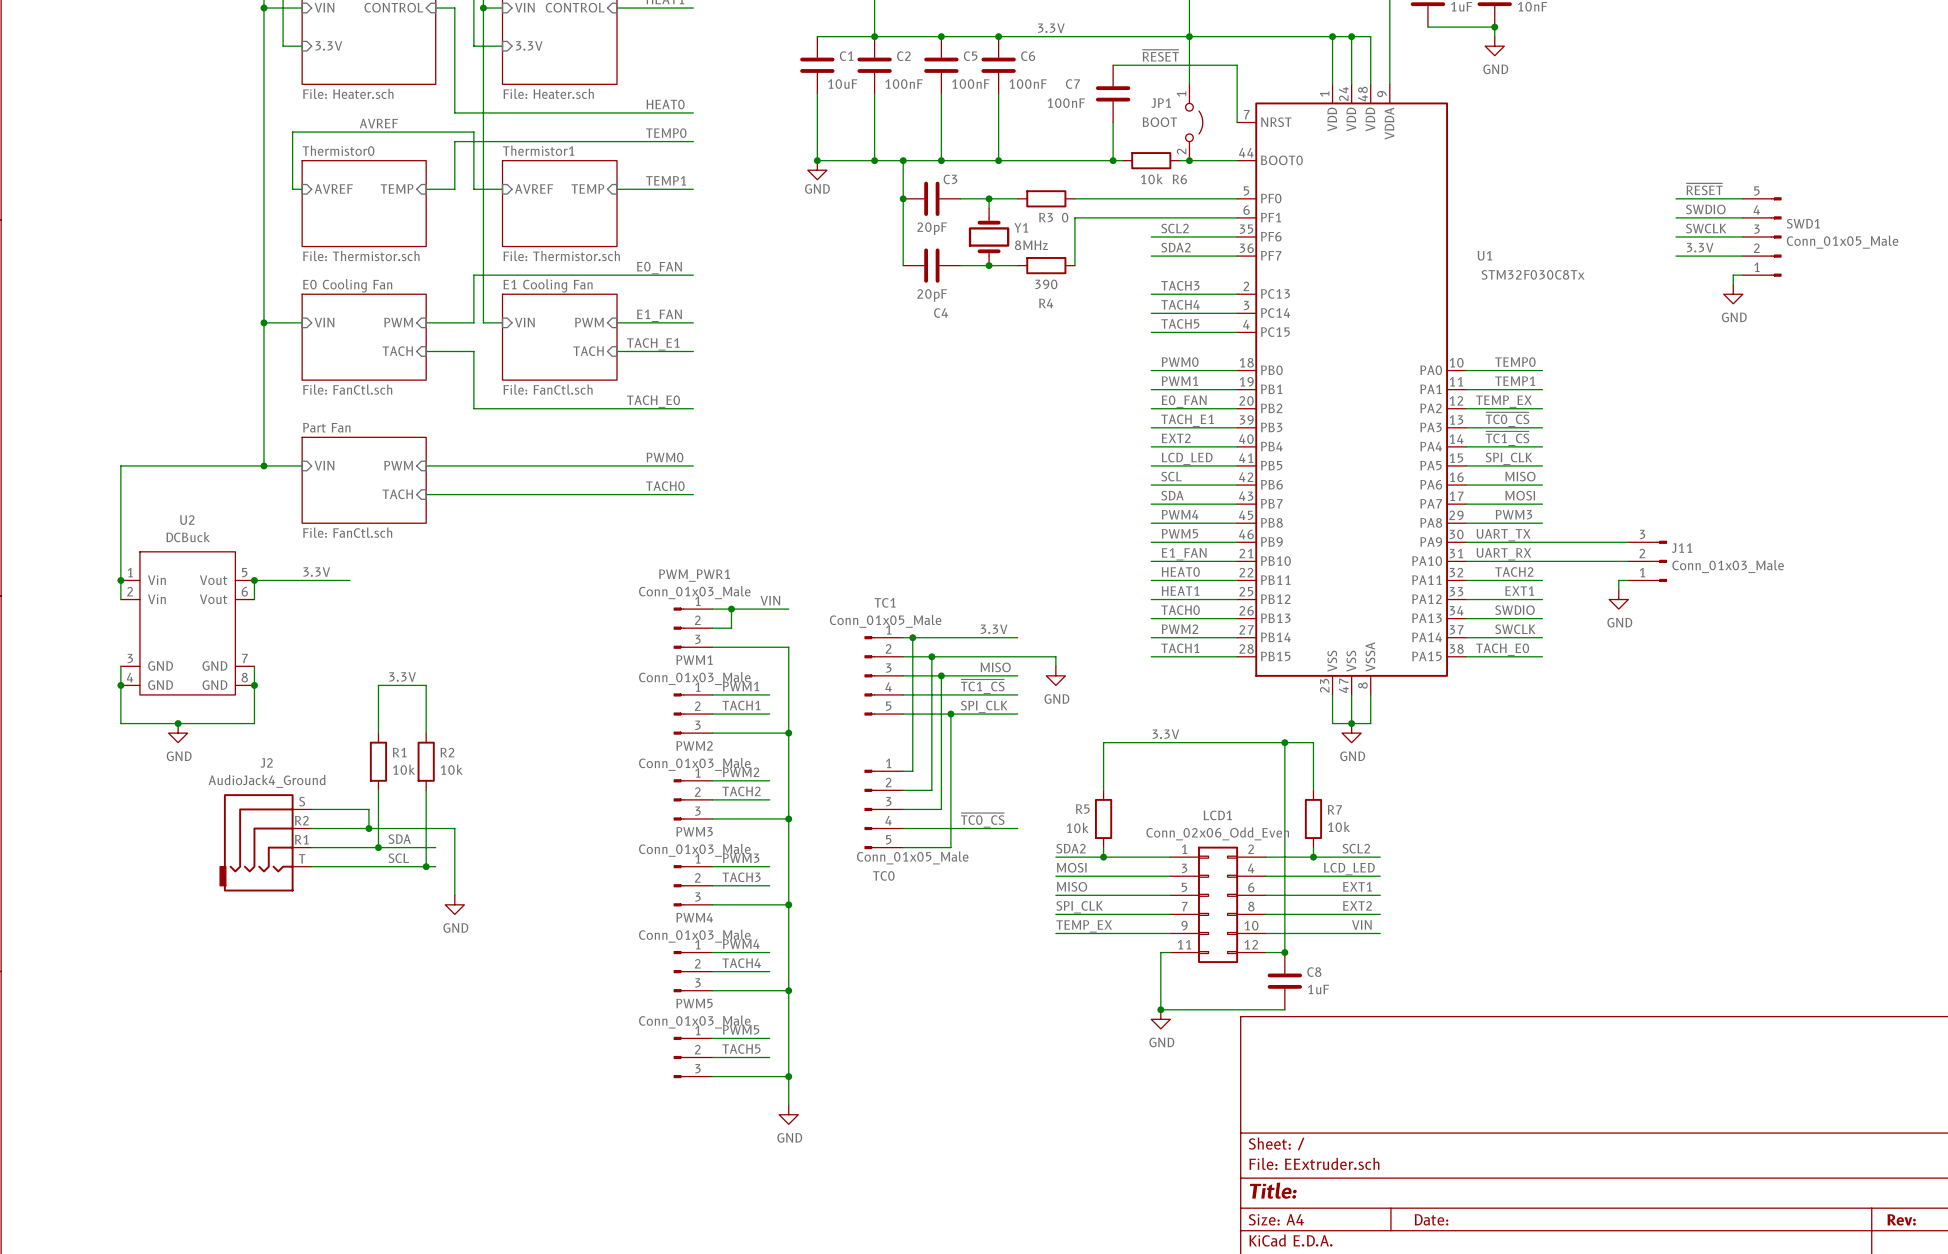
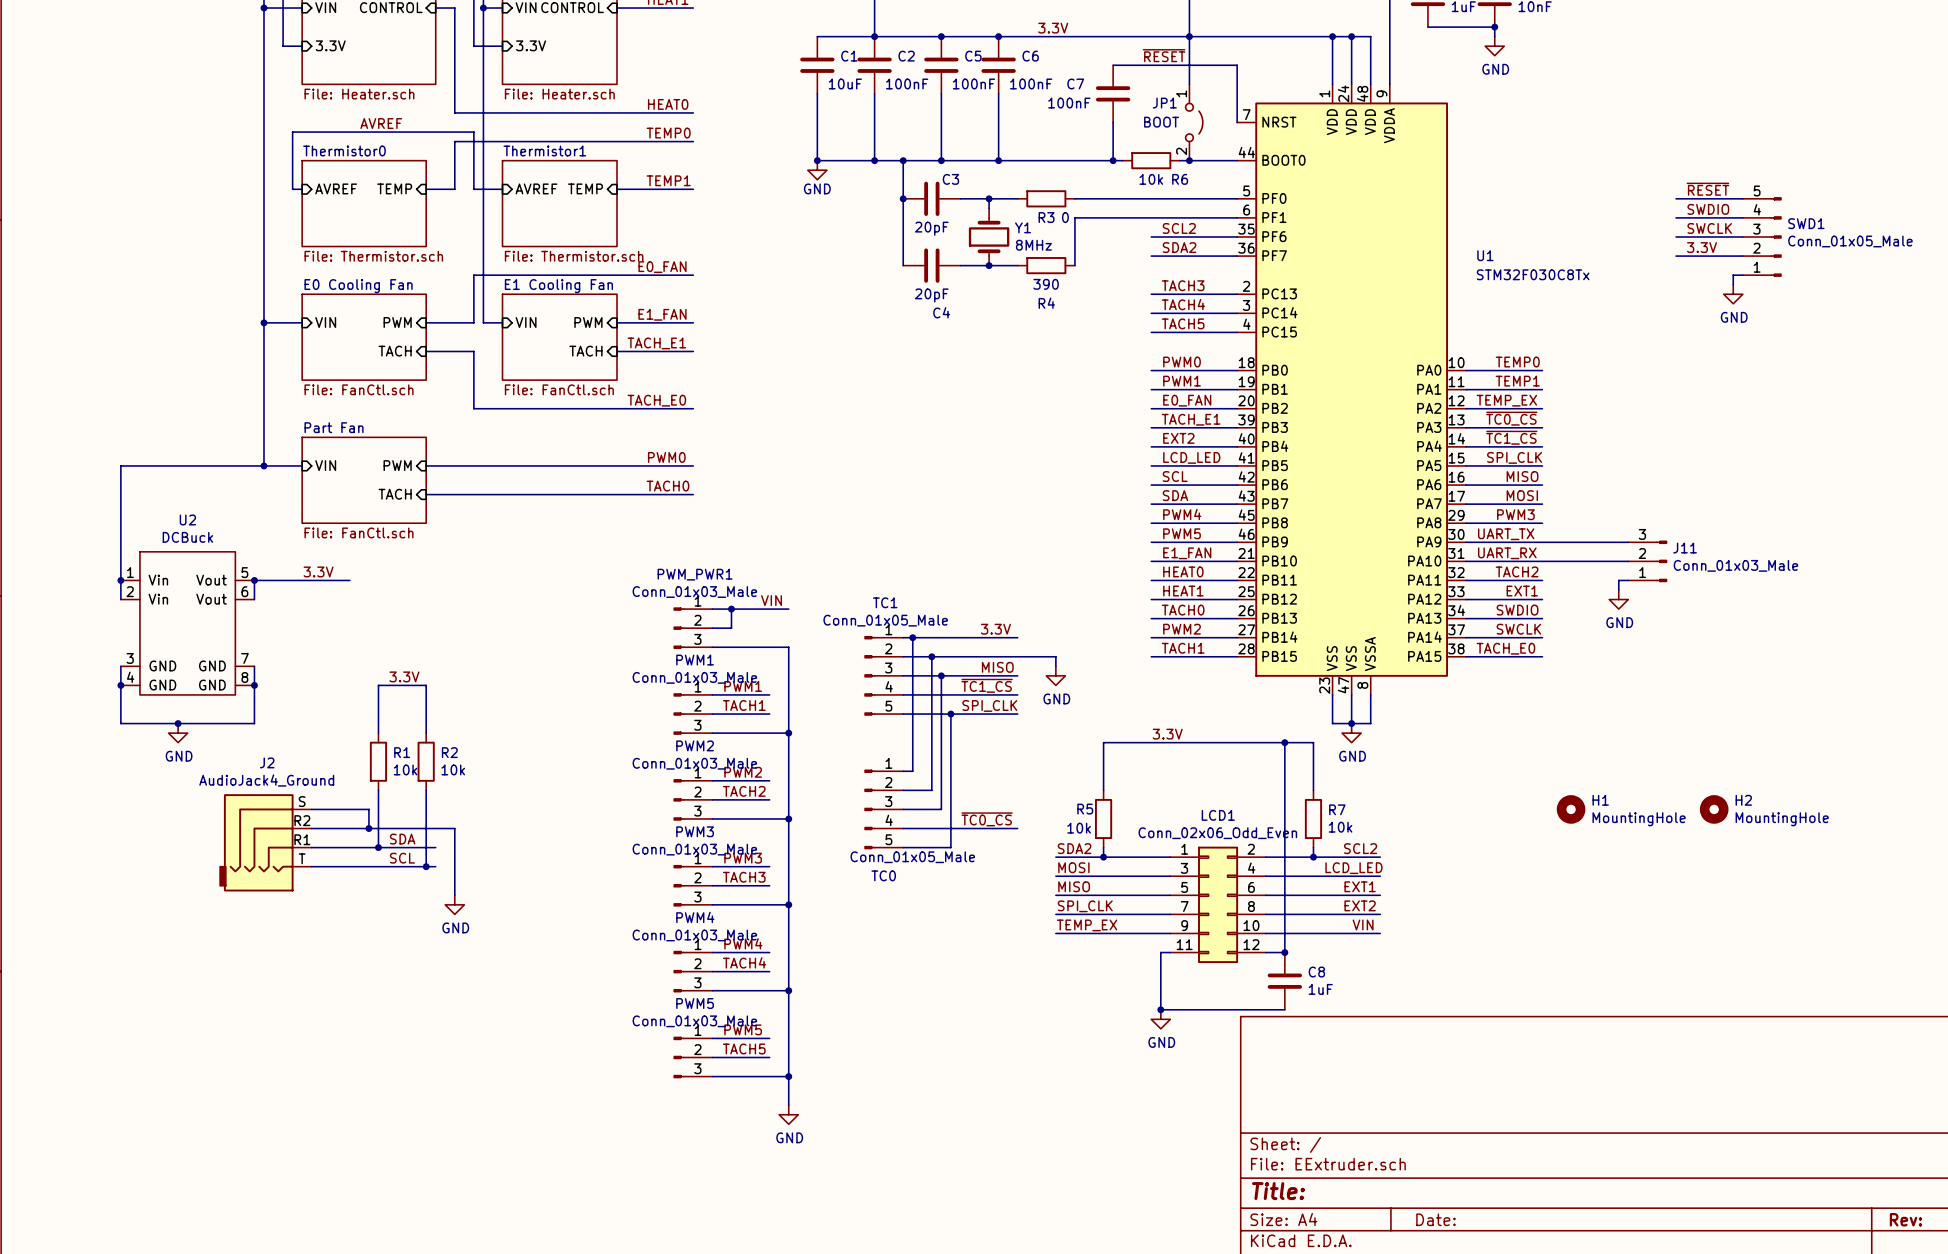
H1: none -> MountingHole (1571, 809)
H2: none -> MountingHole (1714, 809)

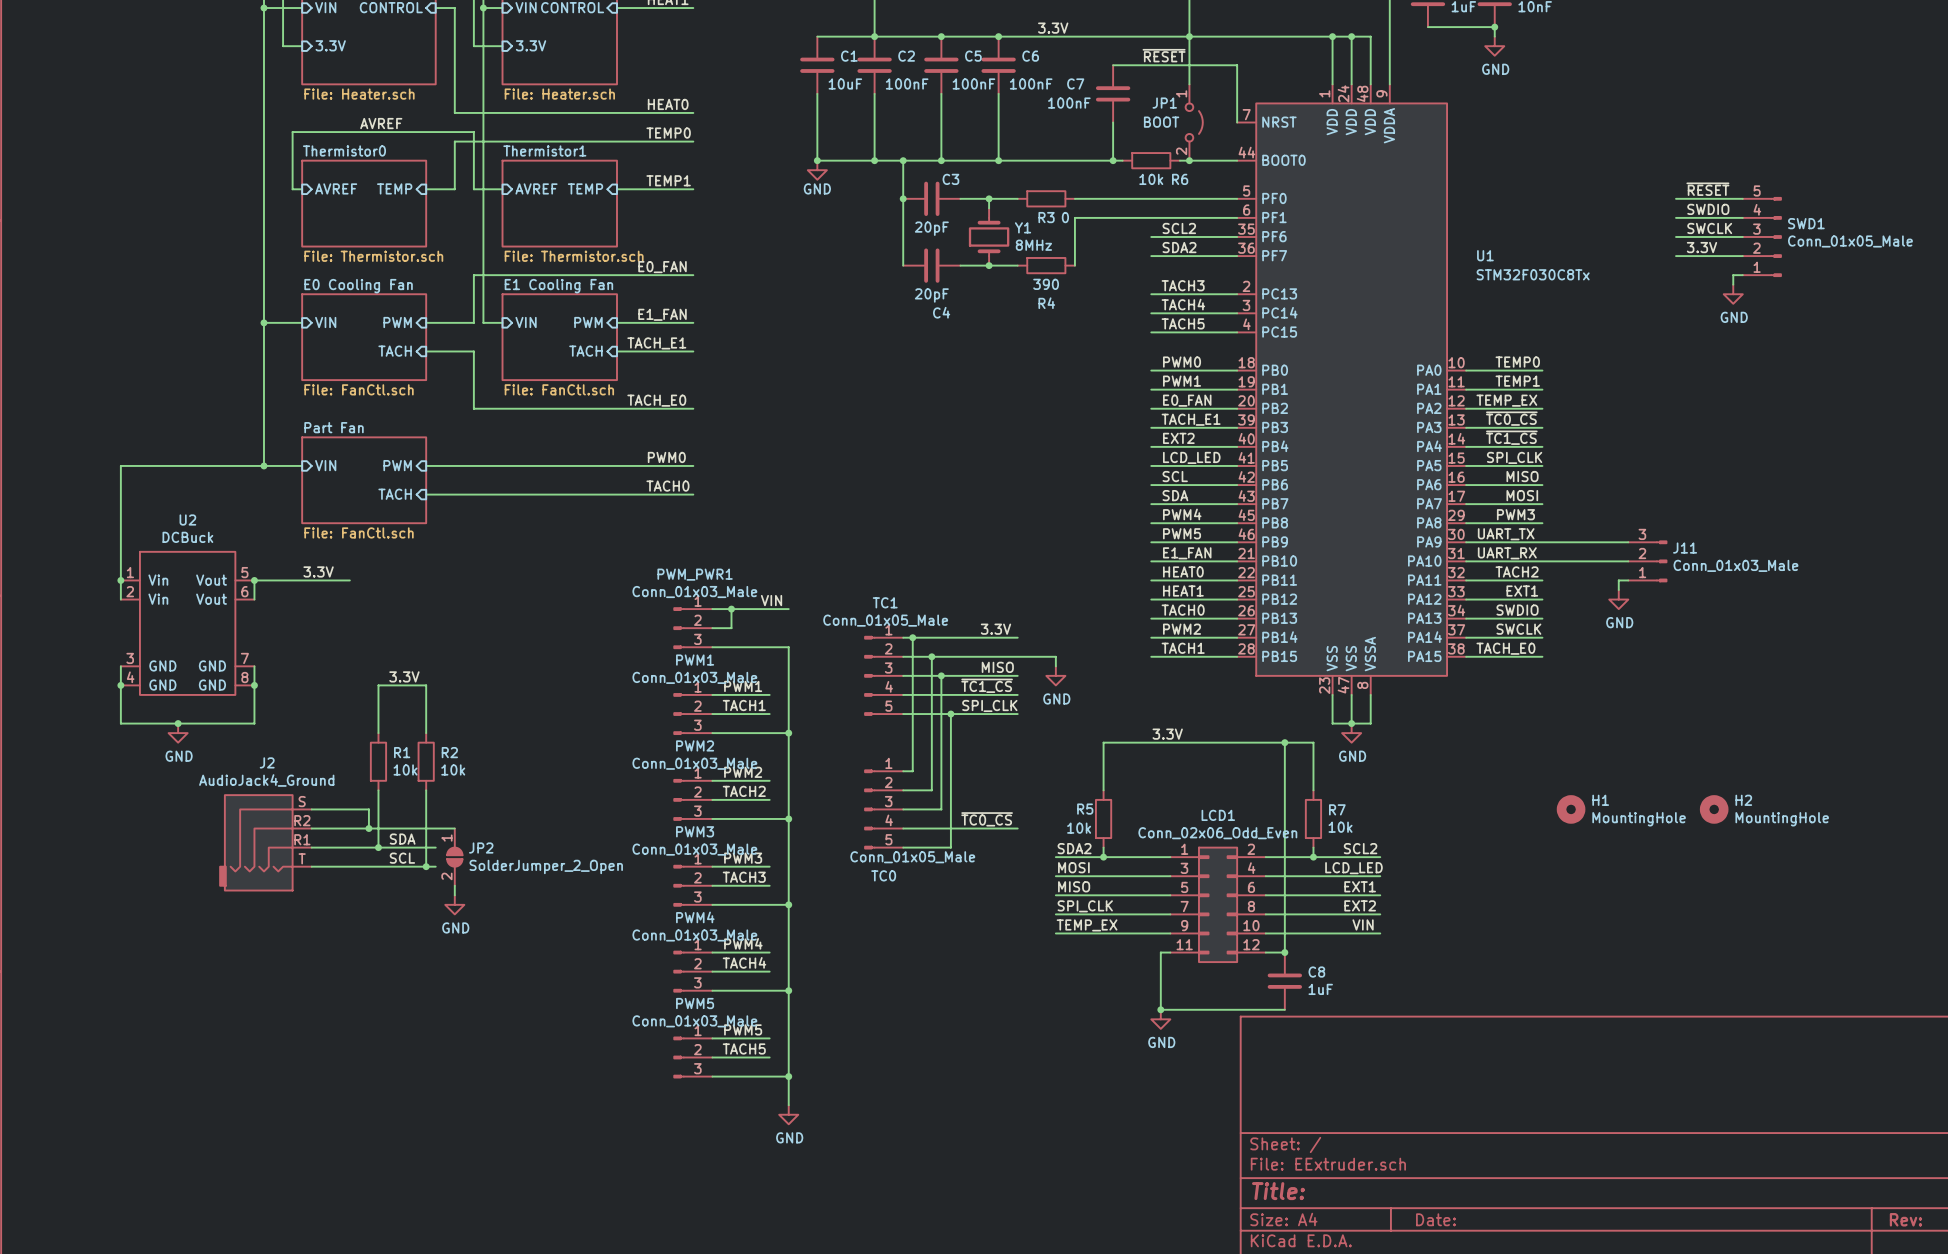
JP2: none -> SolderJumper_2_Open (454, 857)

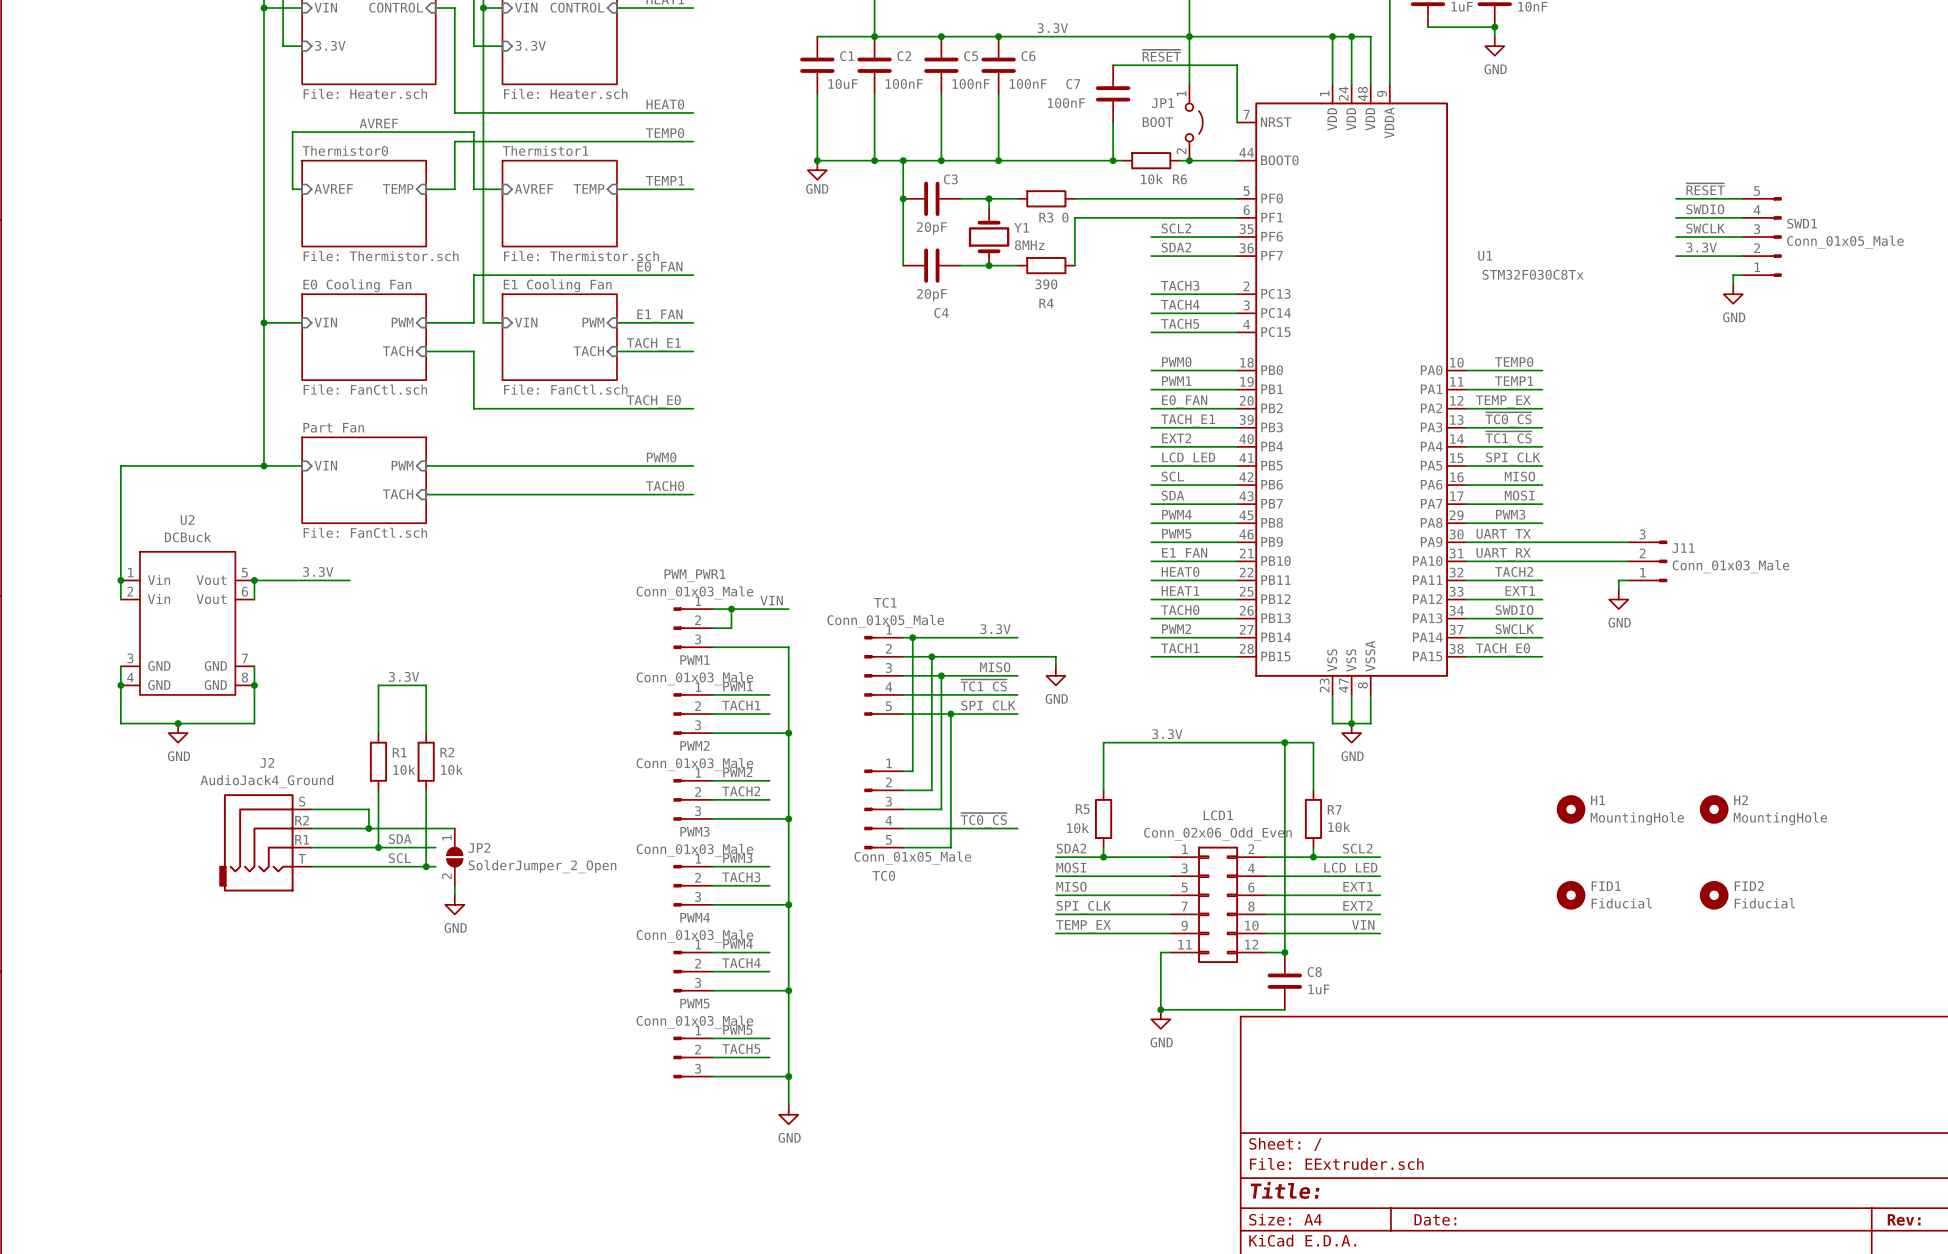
FID1: none -> Fiducial (1571, 895)
FID2: none -> Fiducial (1714, 895)

